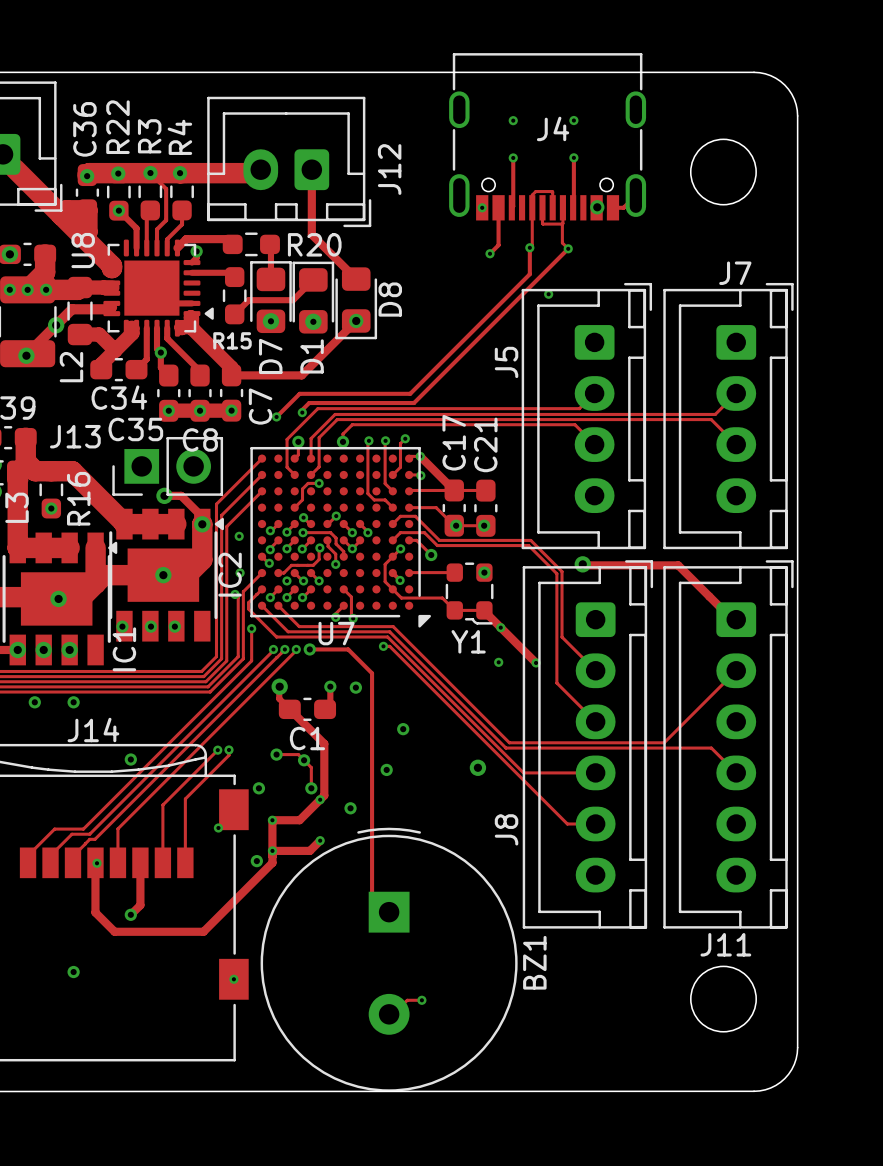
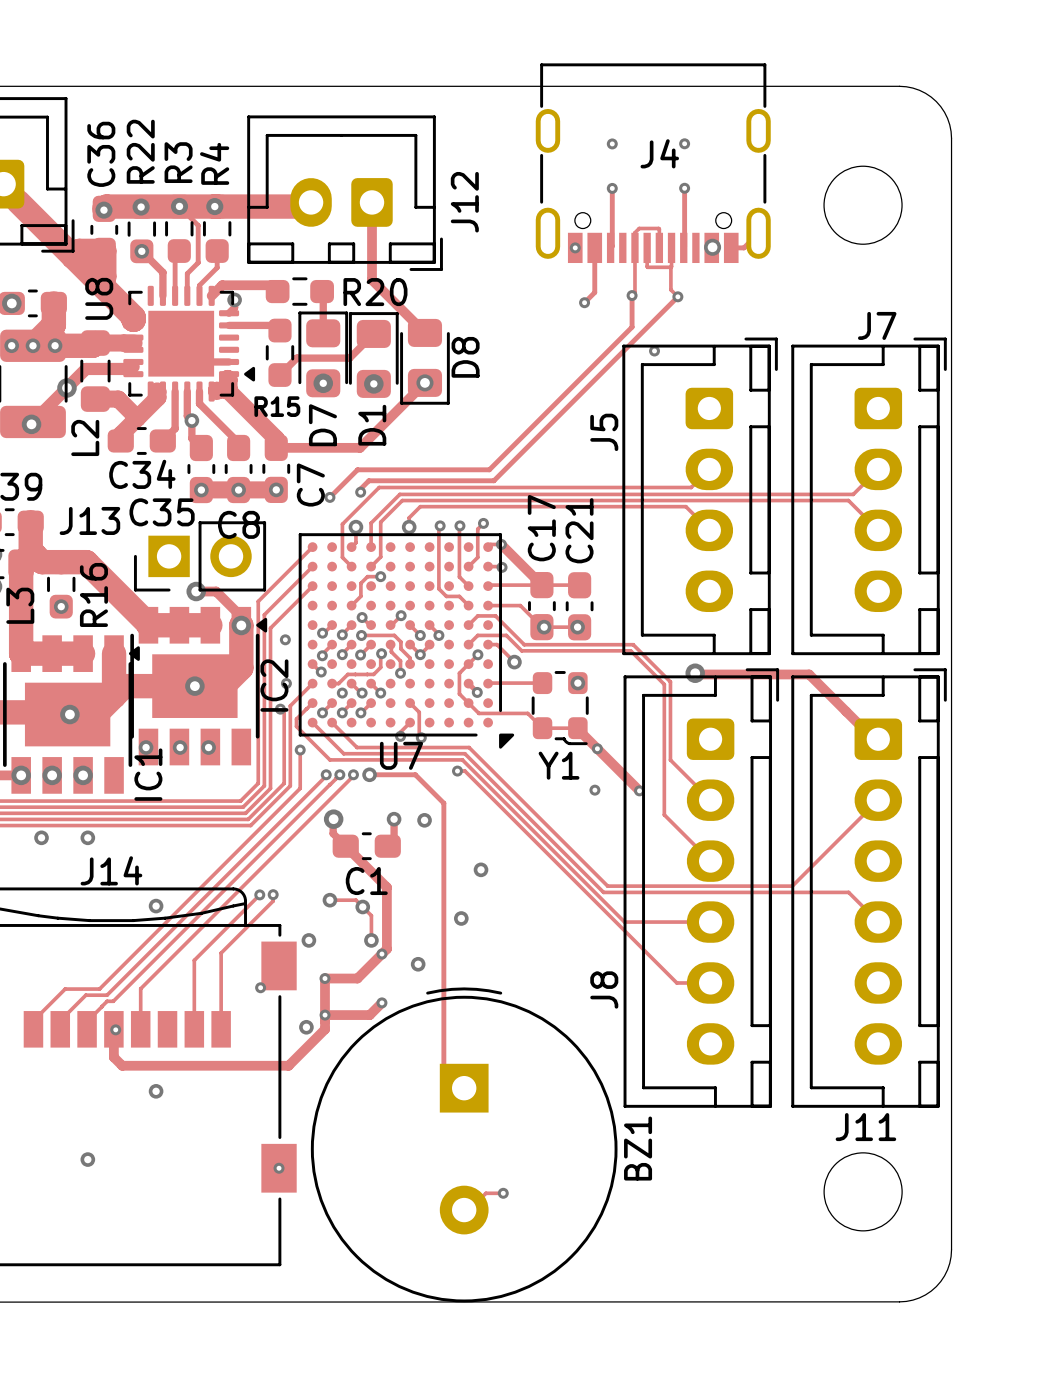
via: (477, 767) -> none
track: (140, 862) (140, 905) (130, 914) -> none
track: (95, 886) (95, 912) (114, 931) (203, 931) (241, 893) -> (113, 1057) (122, 1065) (288, 1065)

